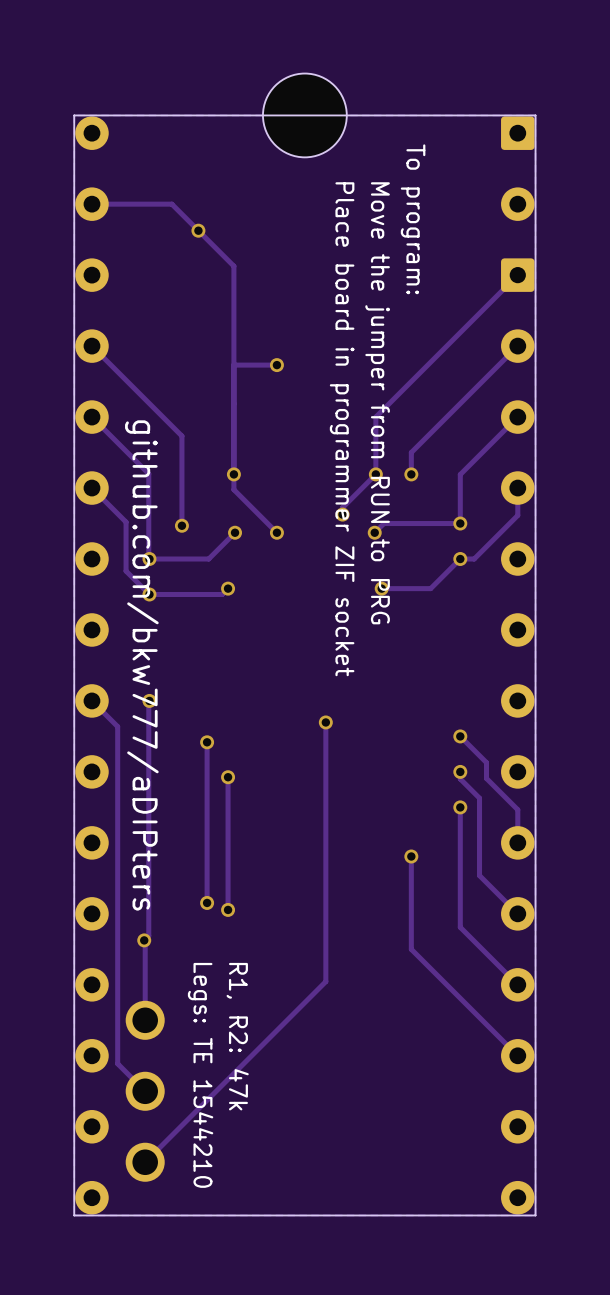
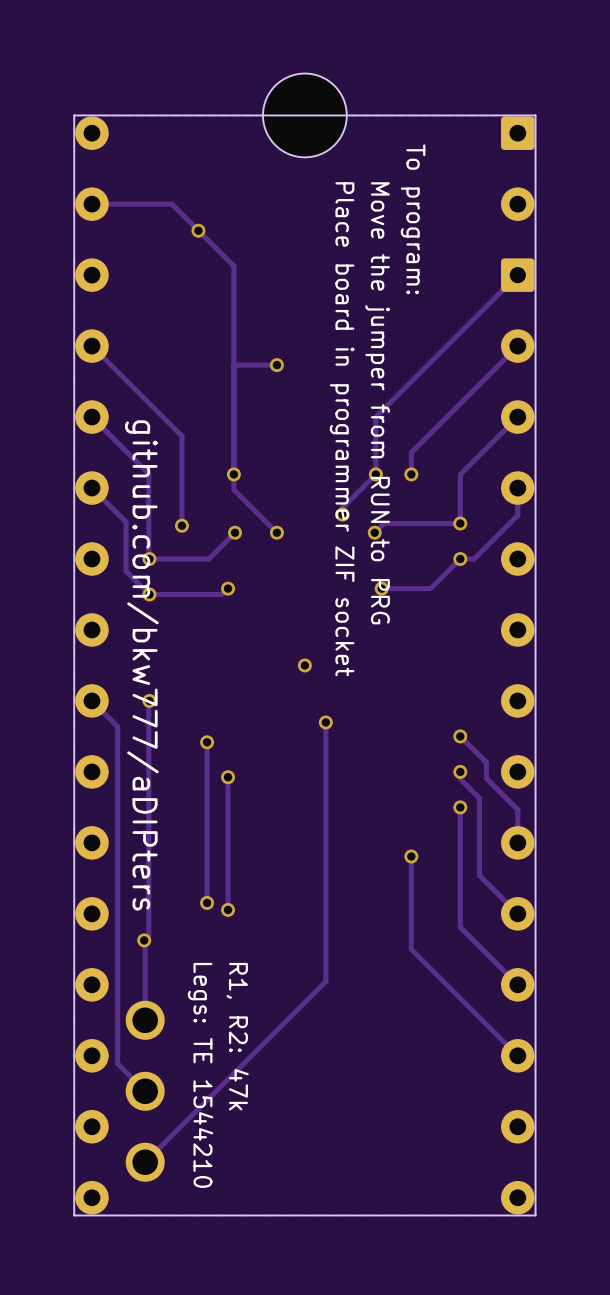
via: none -> (304, 665)

